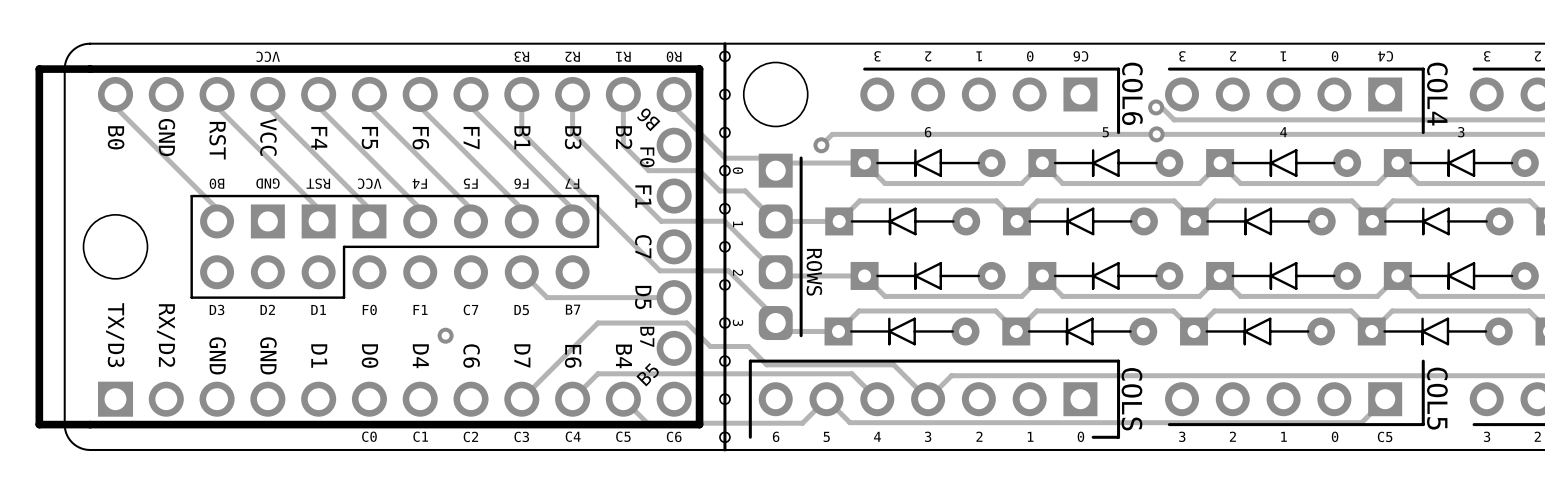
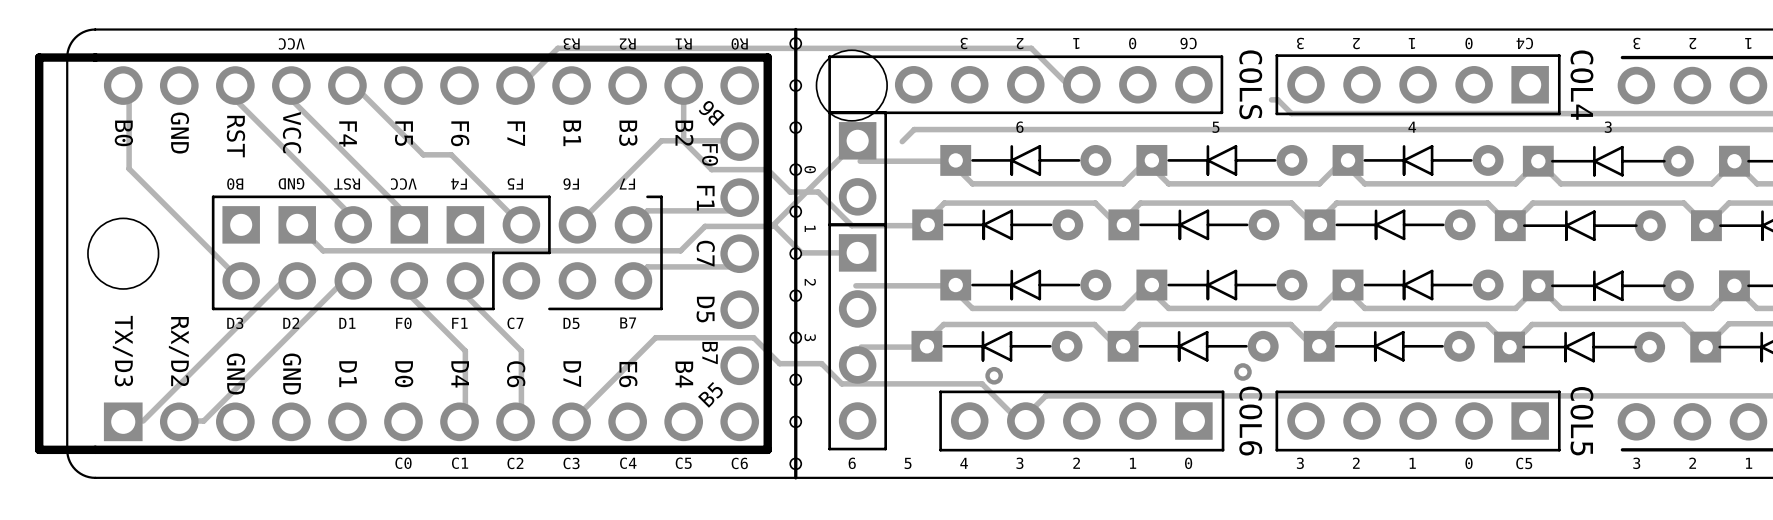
line: (864, 69) (1118, 69) (1118, 132) -> none
line: (1169, 69) (1423, 69) (1423, 132) -> none
part footprint: [1165, 77, 1403, 112] -> [1275, 54, 1561, 116]
track: none -> (129, 84) (129, 168) (241, 280)
track: none -> (353, 84) (423, 154) (451, 154) (521, 224)
part: none -> (1025, 84)
track: none -> (1067, 84) (1031, 48) (557, 48) (521, 84)
text position: COL6 (1132, 93) -> COL6 (1250, 421)
track: (521, 94) (521, 132) (660, 270) (728, 270) (775, 318) -> none
track: (572, 94) (572, 132) (661, 221) (724, 221) (775, 272) -> none
part: (978, 94) -> none
track: (115, 107) (217, 208) -> none
track: (318, 107) (420, 208) -> none
track: (369, 107) (471, 208) -> none
track: (420, 107) (521, 208) -> none
track: (471, 107) (572, 208) -> none
track: (674, 107) (725, 158) (763, 158) -> none
via: (1156, 107) -> none
via: (1156, 134) -> none
track: none -> (745, 140) (661, 140) (577, 224)
track: none -> (857, 140) (772, 226) (705, 226) (680, 250) (323, 250) (297, 224)
via: (821, 145) -> none
part footprint: [850, 149, 1006, 178] -> [940, 144, 1112, 176]
part footprint: [1028, 149, 1184, 178] -> [1136, 144, 1308, 176]
part footprint: [1206, 149, 1362, 178] -> [1332, 144, 1504, 176]
line: (801, 157) (801, 335) -> none
part: none -> (857, 168)
part footprint: [190, 194, 600, 299] -> [211, 195, 663, 311]
track: none -> (745, 196) (731, 210) (647, 210) (633, 224)
part footprint: [825, 207, 981, 236] -> [912, 209, 1084, 241]
part footprint: [1002, 207, 1158, 236] -> [1108, 209, 1280, 241]
part footprint: [1180, 207, 1336, 236] -> [1304, 209, 1476, 241]
track: none -> (773, 224) (801, 252) (857, 252)
track: none -> (745, 252) (731, 266) (647, 266) (633, 280)
part: (775, 246) -> none
part footprint: [850, 261, 1006, 290] -> [940, 269, 1112, 301]
part footprint: [1028, 261, 1184, 290] -> [1136, 269, 1308, 301]
part footprint: [1206, 261, 1362, 290] -> [1332, 269, 1504, 301]
track: none -> (283, 280) (143, 421)
track: none -> (343, 280) (203, 421) (185, 421)
track: (521, 272) (547, 297) (674, 297) -> none
text: ROWS (814, 272) -> none
track: none -> (409, 294) (465, 350) (465, 421)
track: none -> (465, 294) (521, 350) (521, 421)
part footprint: [824, 317, 980, 346] -> [911, 330, 1083, 362]
part footprint: [1002, 317, 1158, 346] -> [1107, 330, 1279, 362]
part footprint: [1180, 317, 1335, 346] -> [1303, 330, 1475, 362]
part: none -> (857, 336)
via: (445, 335) -> none
via: none -> (1242, 371)
via: none -> (994, 375)
line: (1423, 361) (1423, 424) (1169, 424) -> none
part footprint: [1165, 382, 1403, 417] -> [1275, 390, 1561, 452]
part: none -> (1081, 421)
track: (877, 399) (851, 373) (597, 373) (572, 399) -> none
part: (928, 399) -> none
text position: COLS (1131, 399) -> COLS (1250, 84)
track: (1385, 399) (1361, 422) (850, 422) (826, 399) (802, 423) (647, 423) (623, 399) -> none
line: (1093, 437) (1118, 437) (1118, 361) (750, 361) (750, 437) -> none

